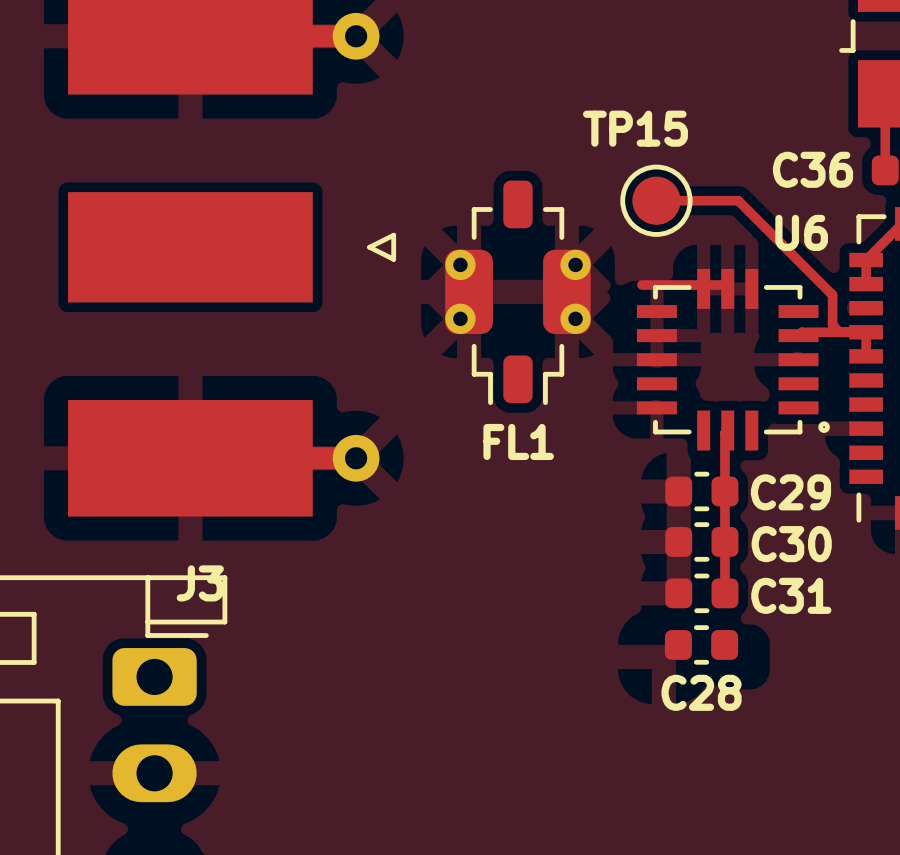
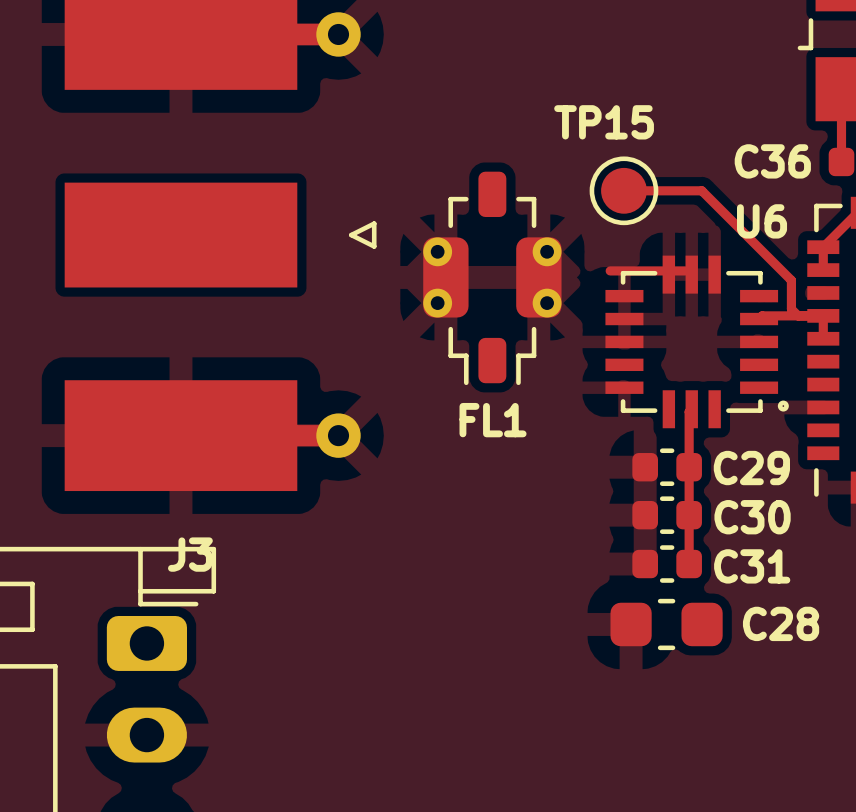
C28 footprint: [664, 625, 739, 665] -> [610, 598, 723, 651]
C28 name position: C28 (701, 692) -> C28 (781, 623)

